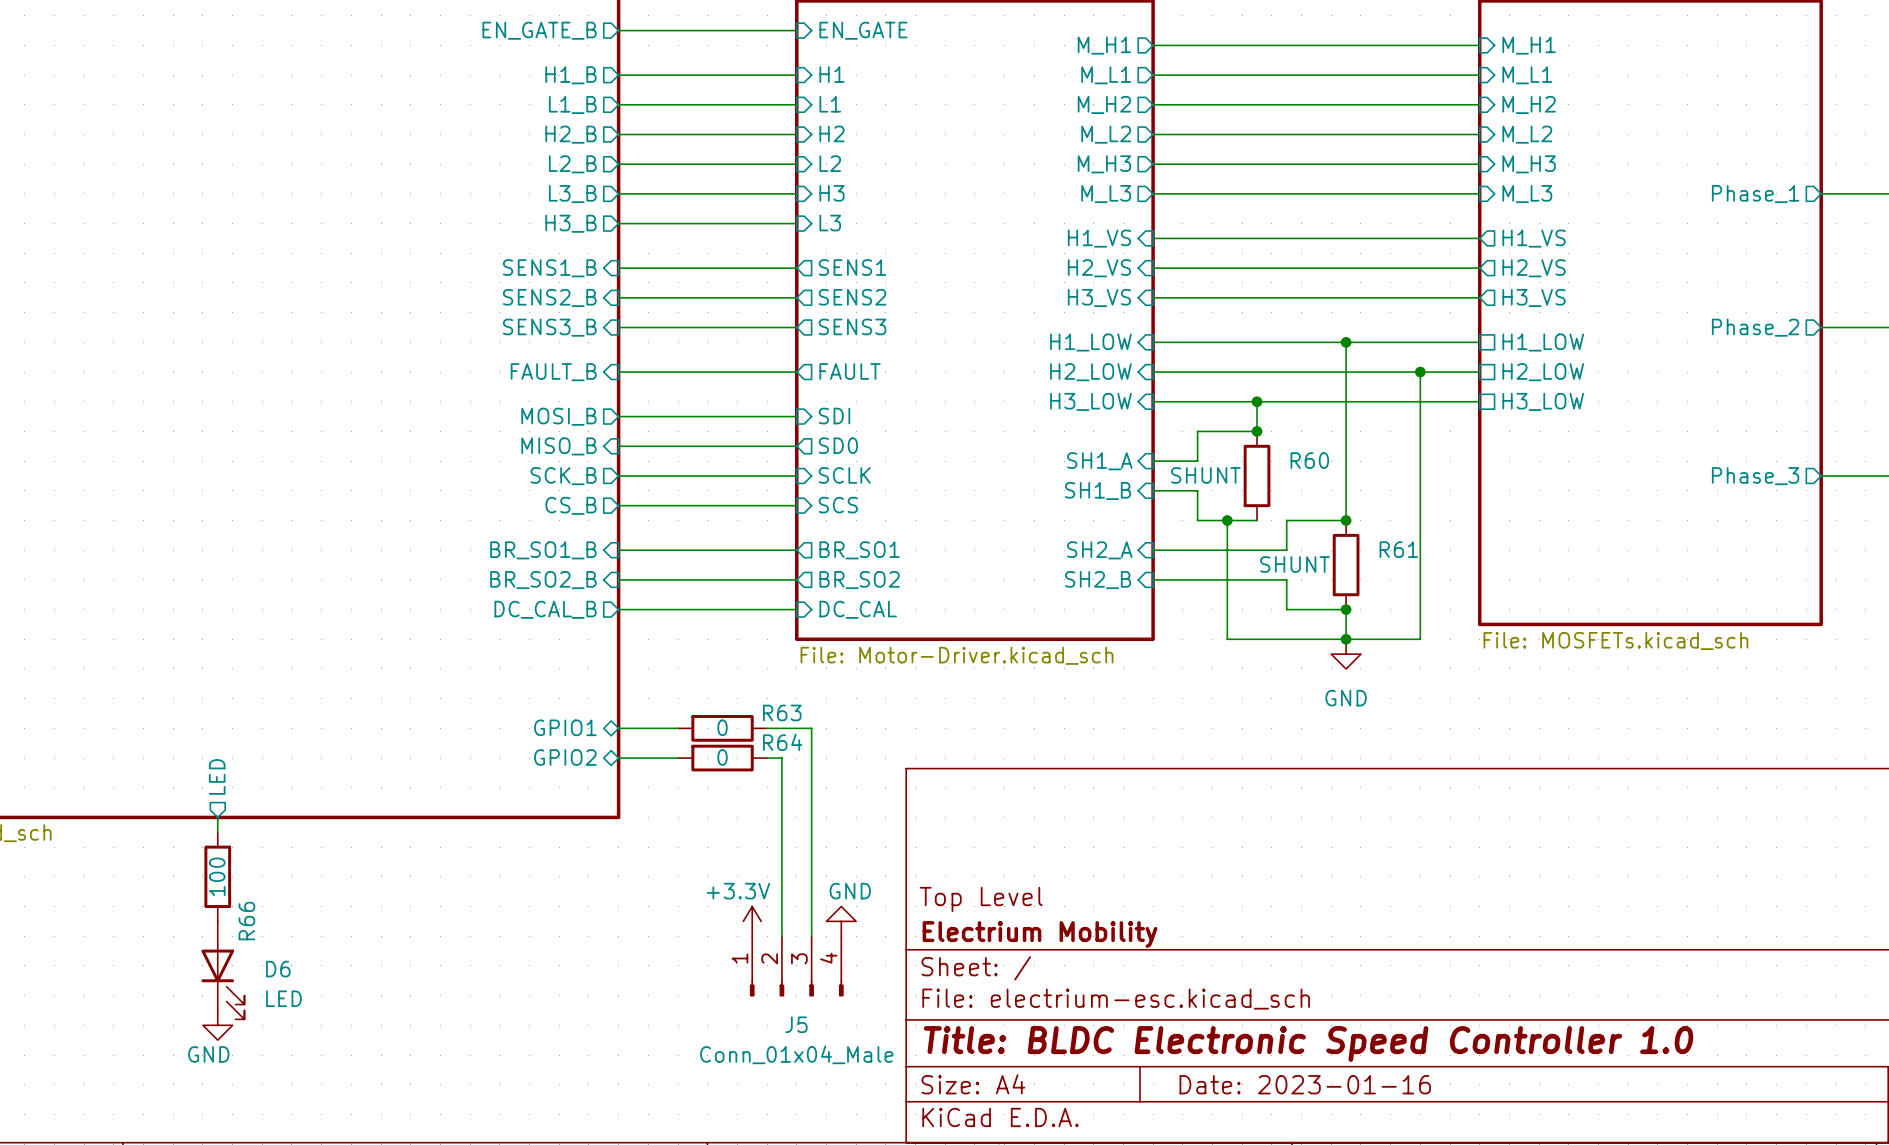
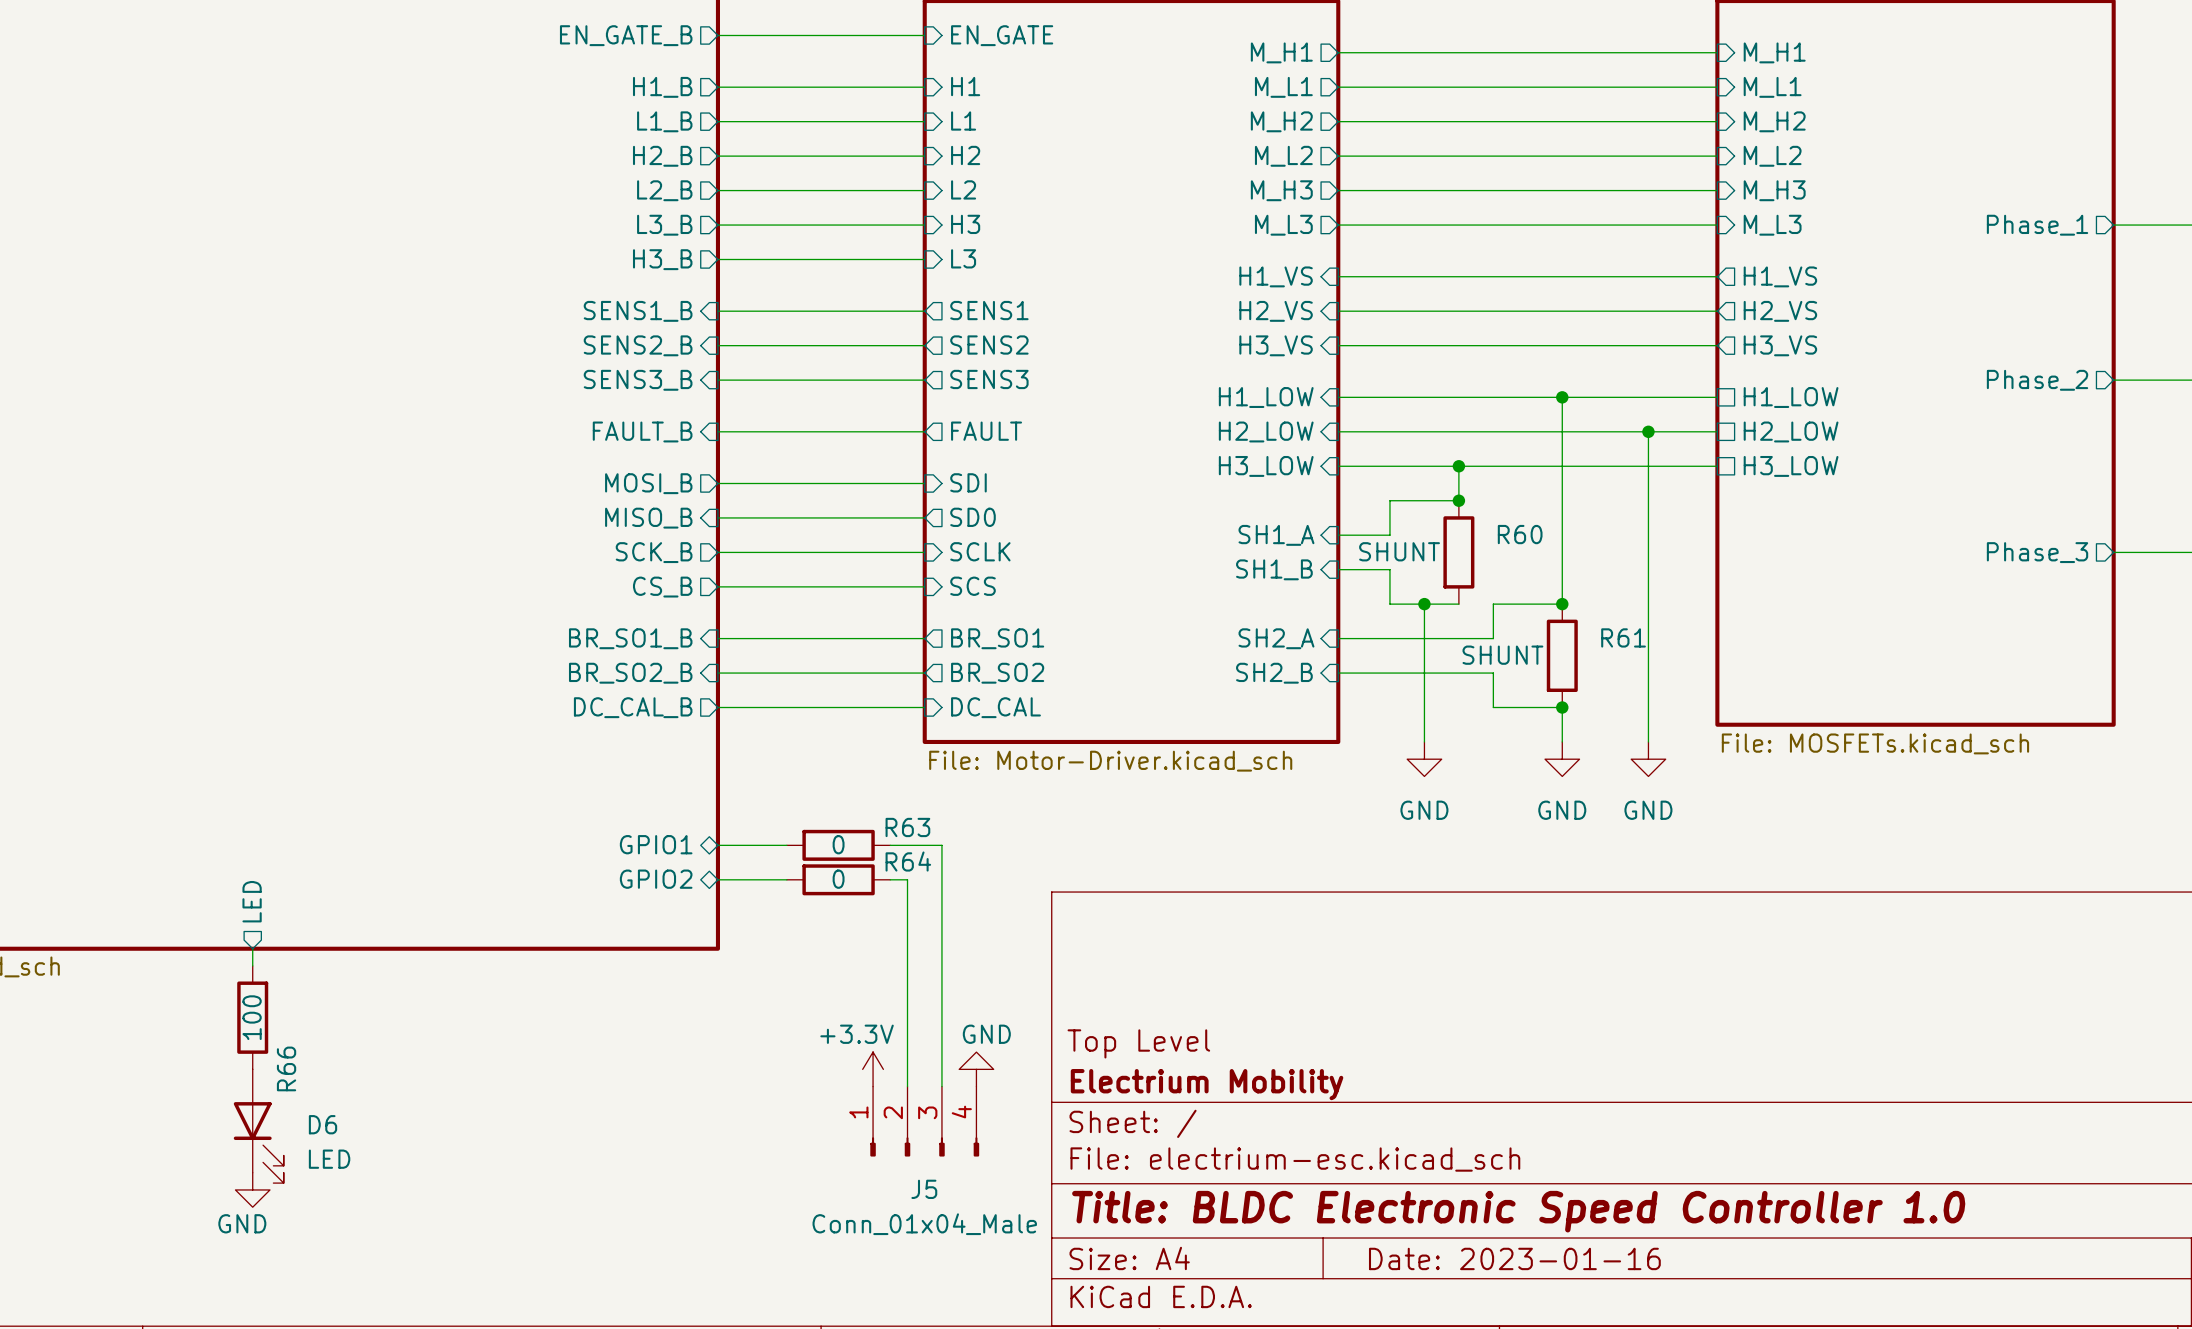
wire: (1227, 639) (1420, 639) -> none
junction: (1346, 639) -> none
power symbol: none -> GND (1424, 759)
power symbol: none -> GND (1648, 759)

